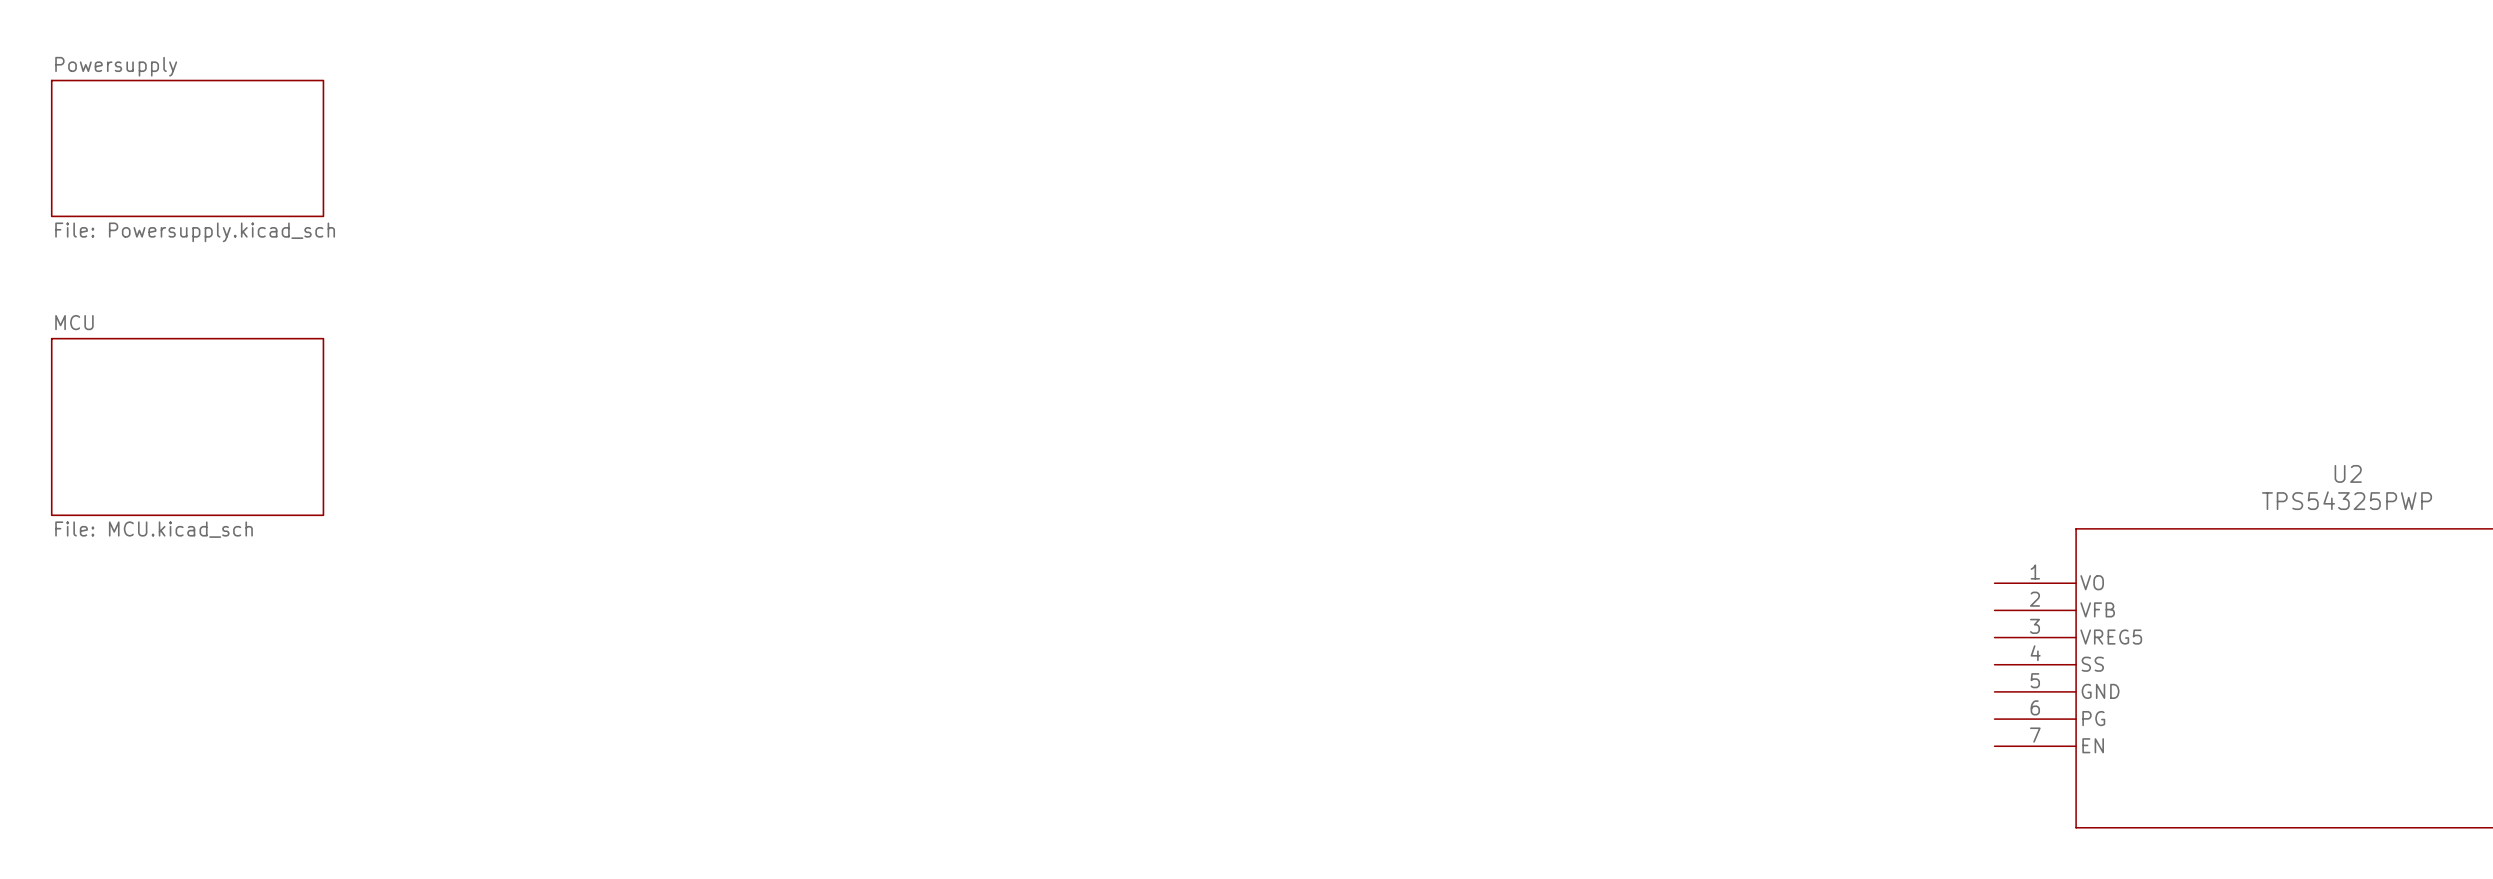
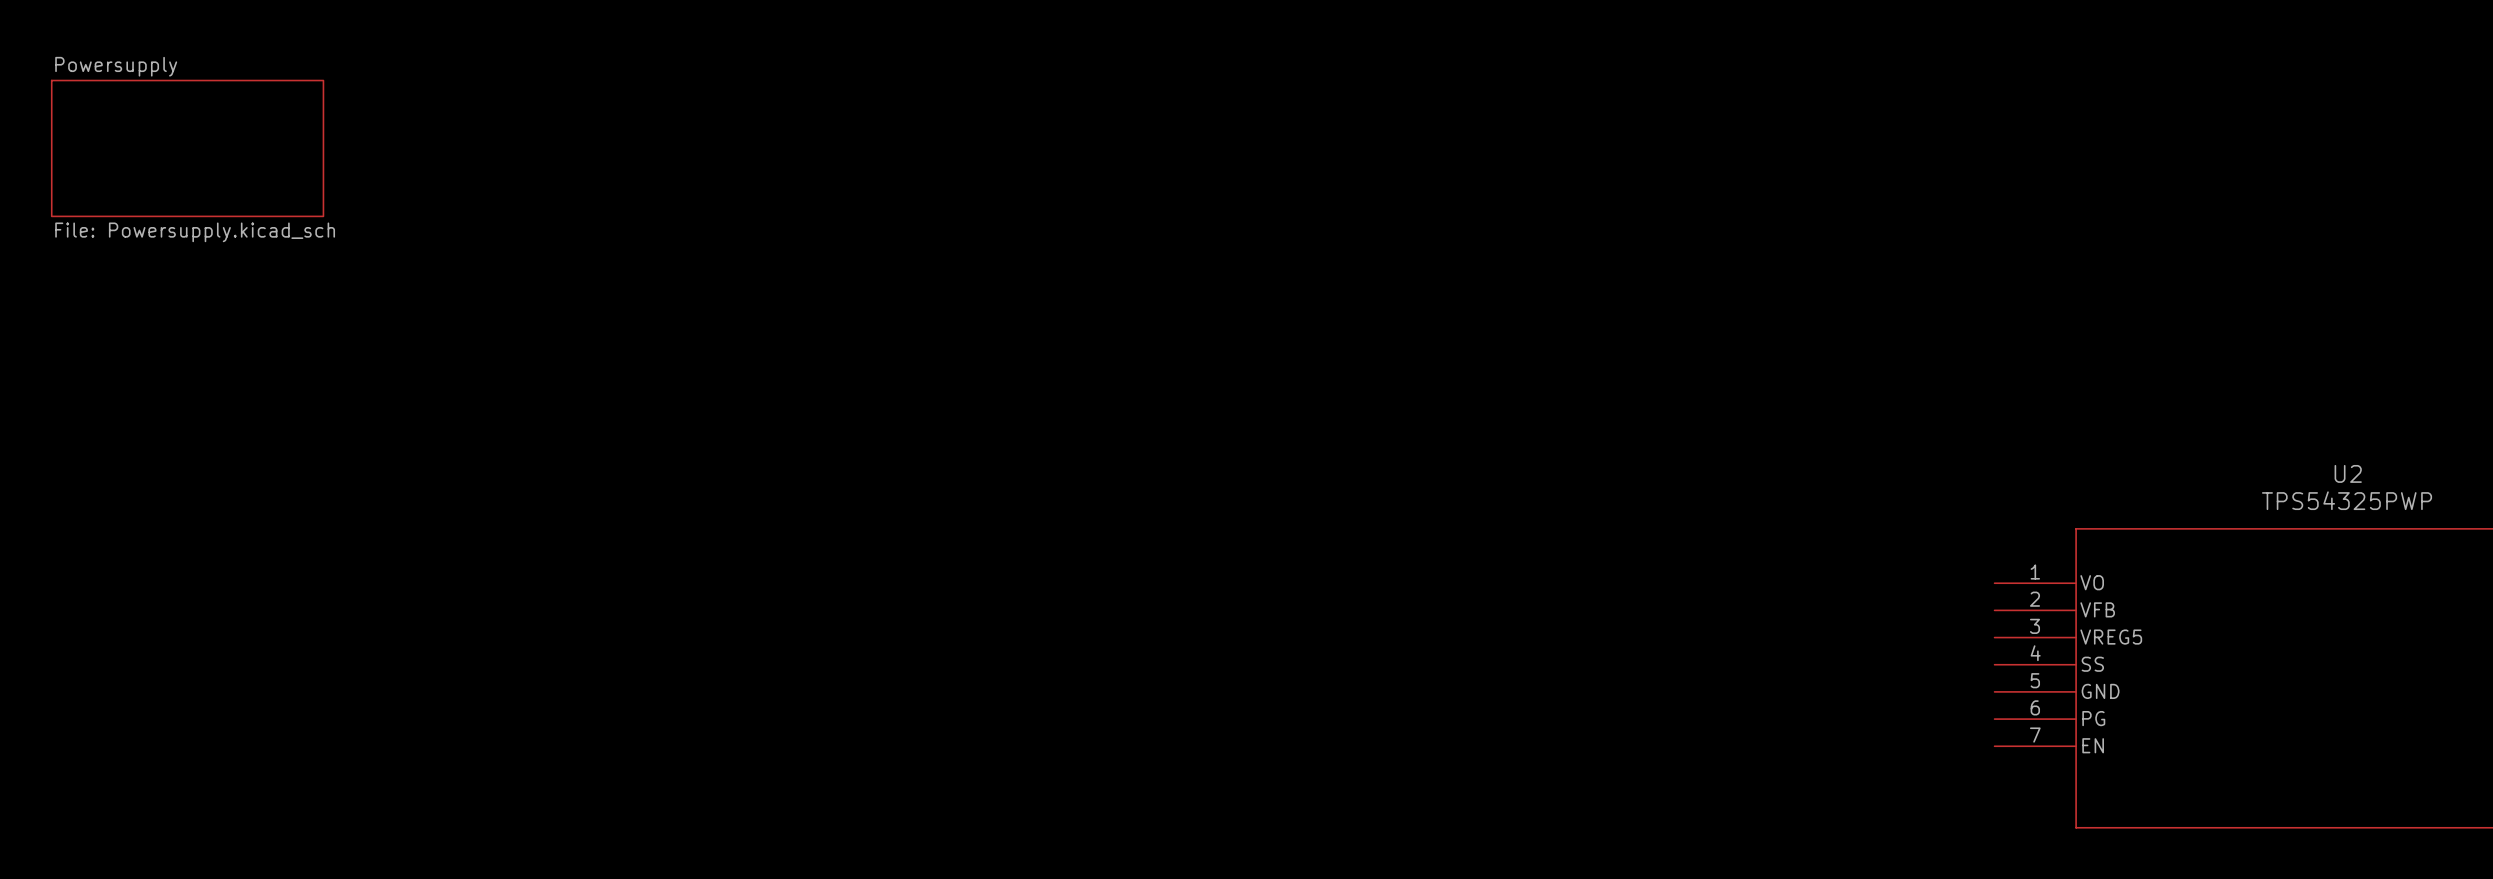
sheet MCU: File: MCU.kicad_sch (187, 426) -> none

